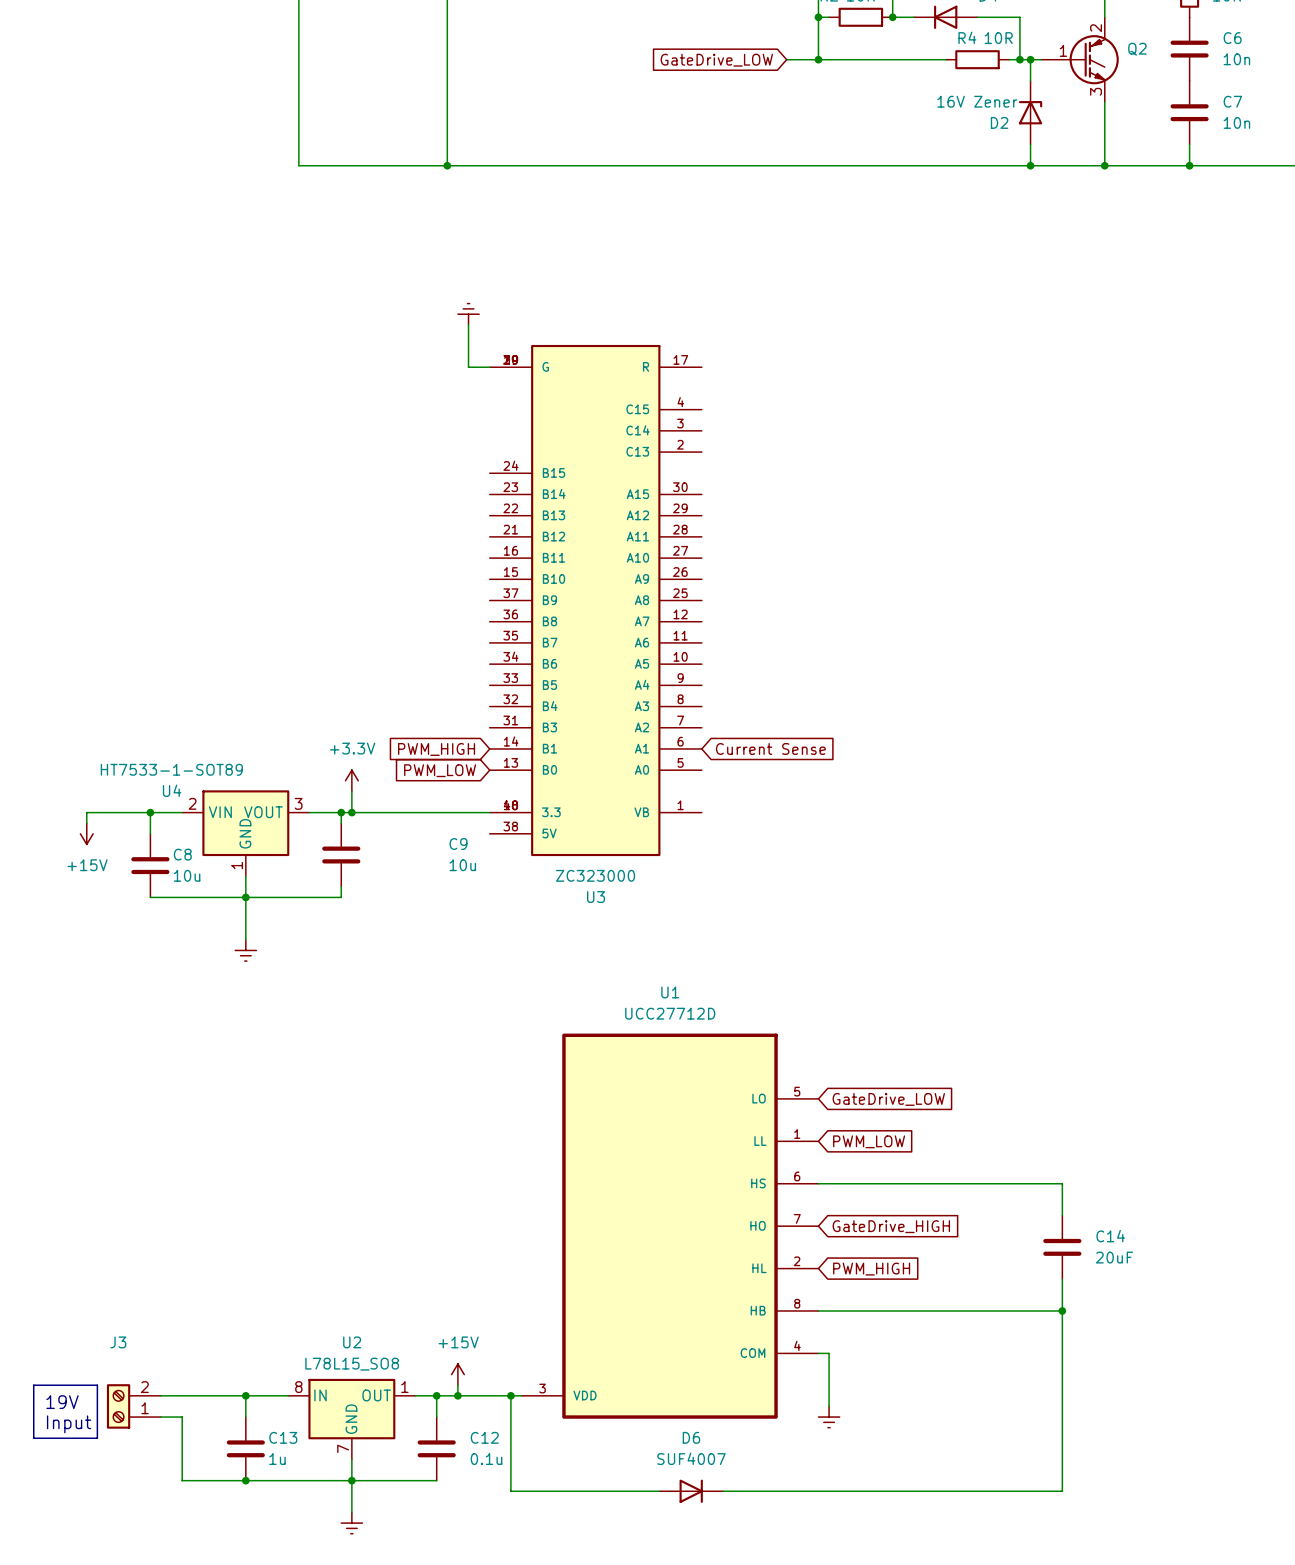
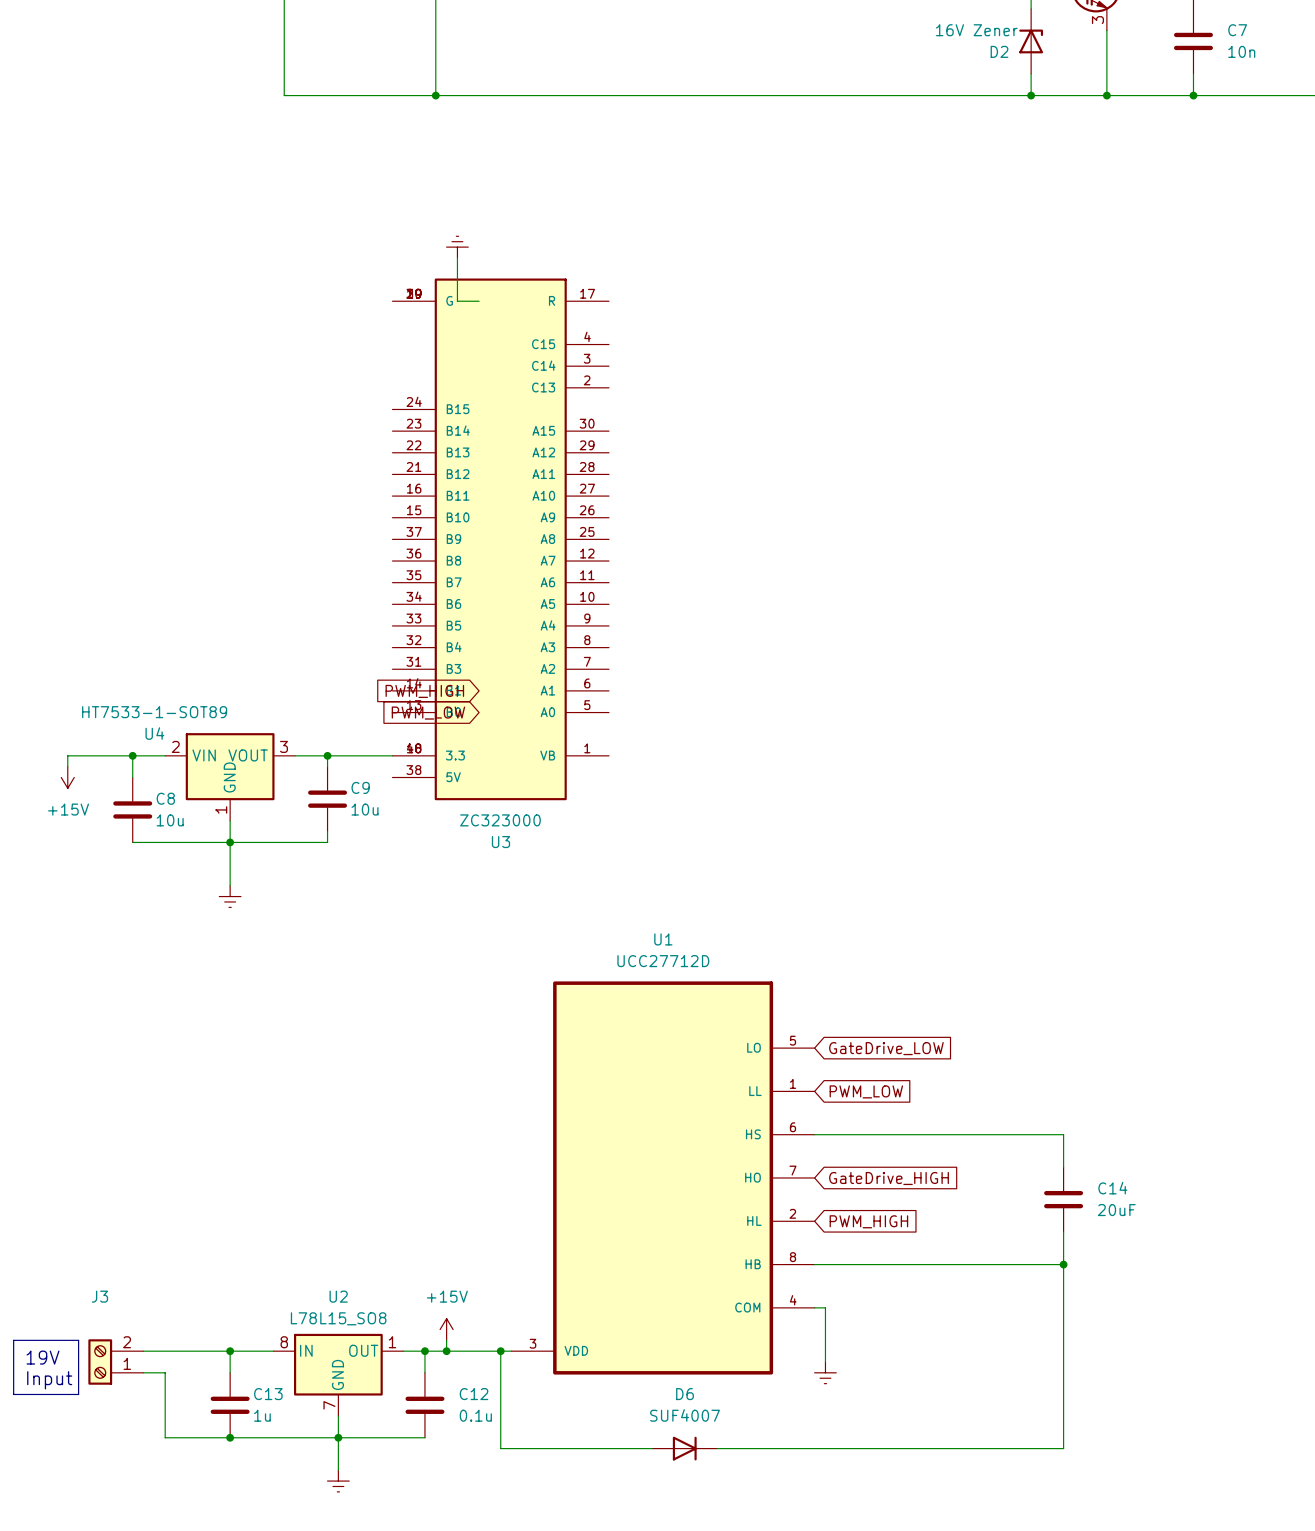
U3 position: (595, 600) -> (500, 539)
global label: Current Sense (770, 748) -> none
power symbol: +3.3V (351, 780) -> none
wire: (351, 791) (351, 812) -> none
junction: (351, 812) -> none
C9 name position: C9 (458, 844) -> C9 (360, 787)
C9 value position: 10u (462, 865) -> 10u (365, 809)

